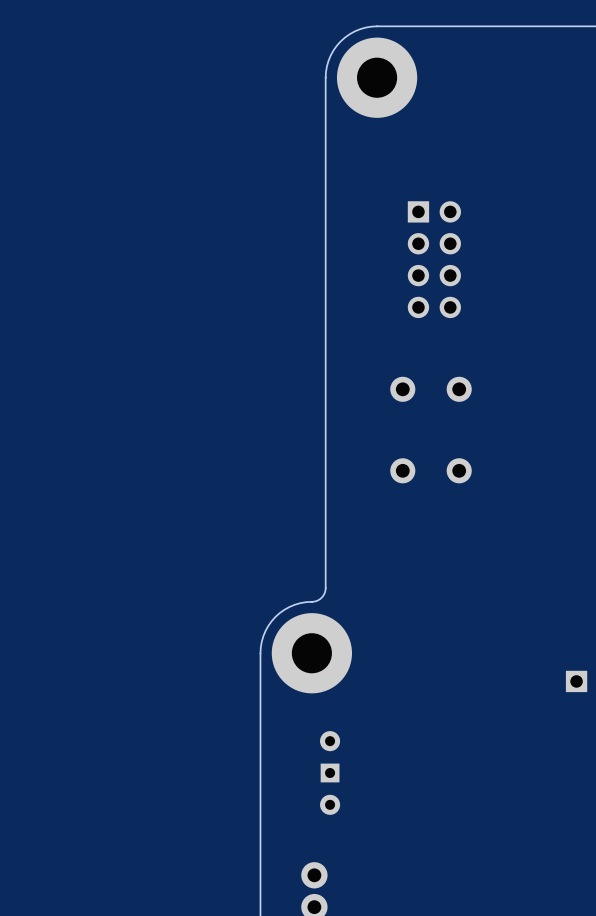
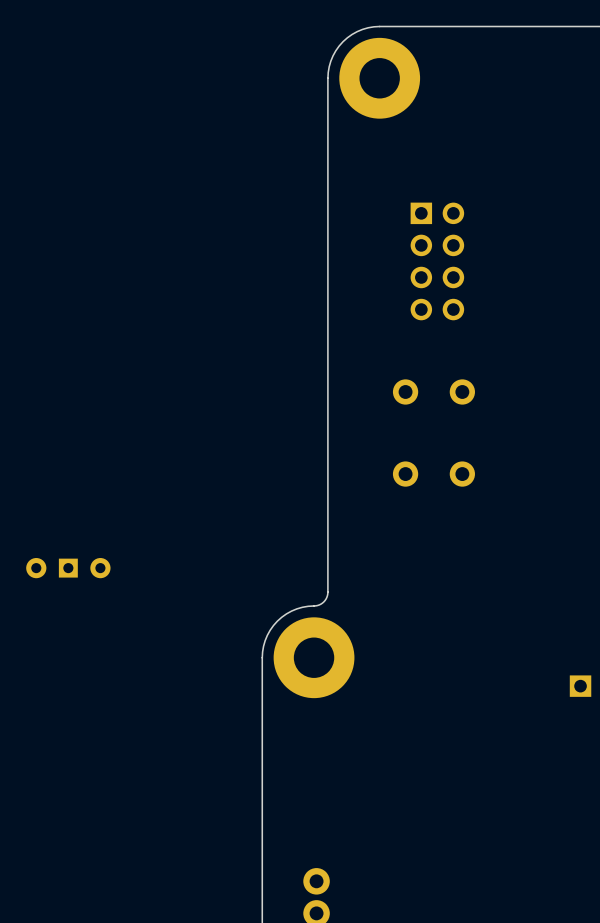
part: none -> (68, 568)
part: (330, 772) -> none

